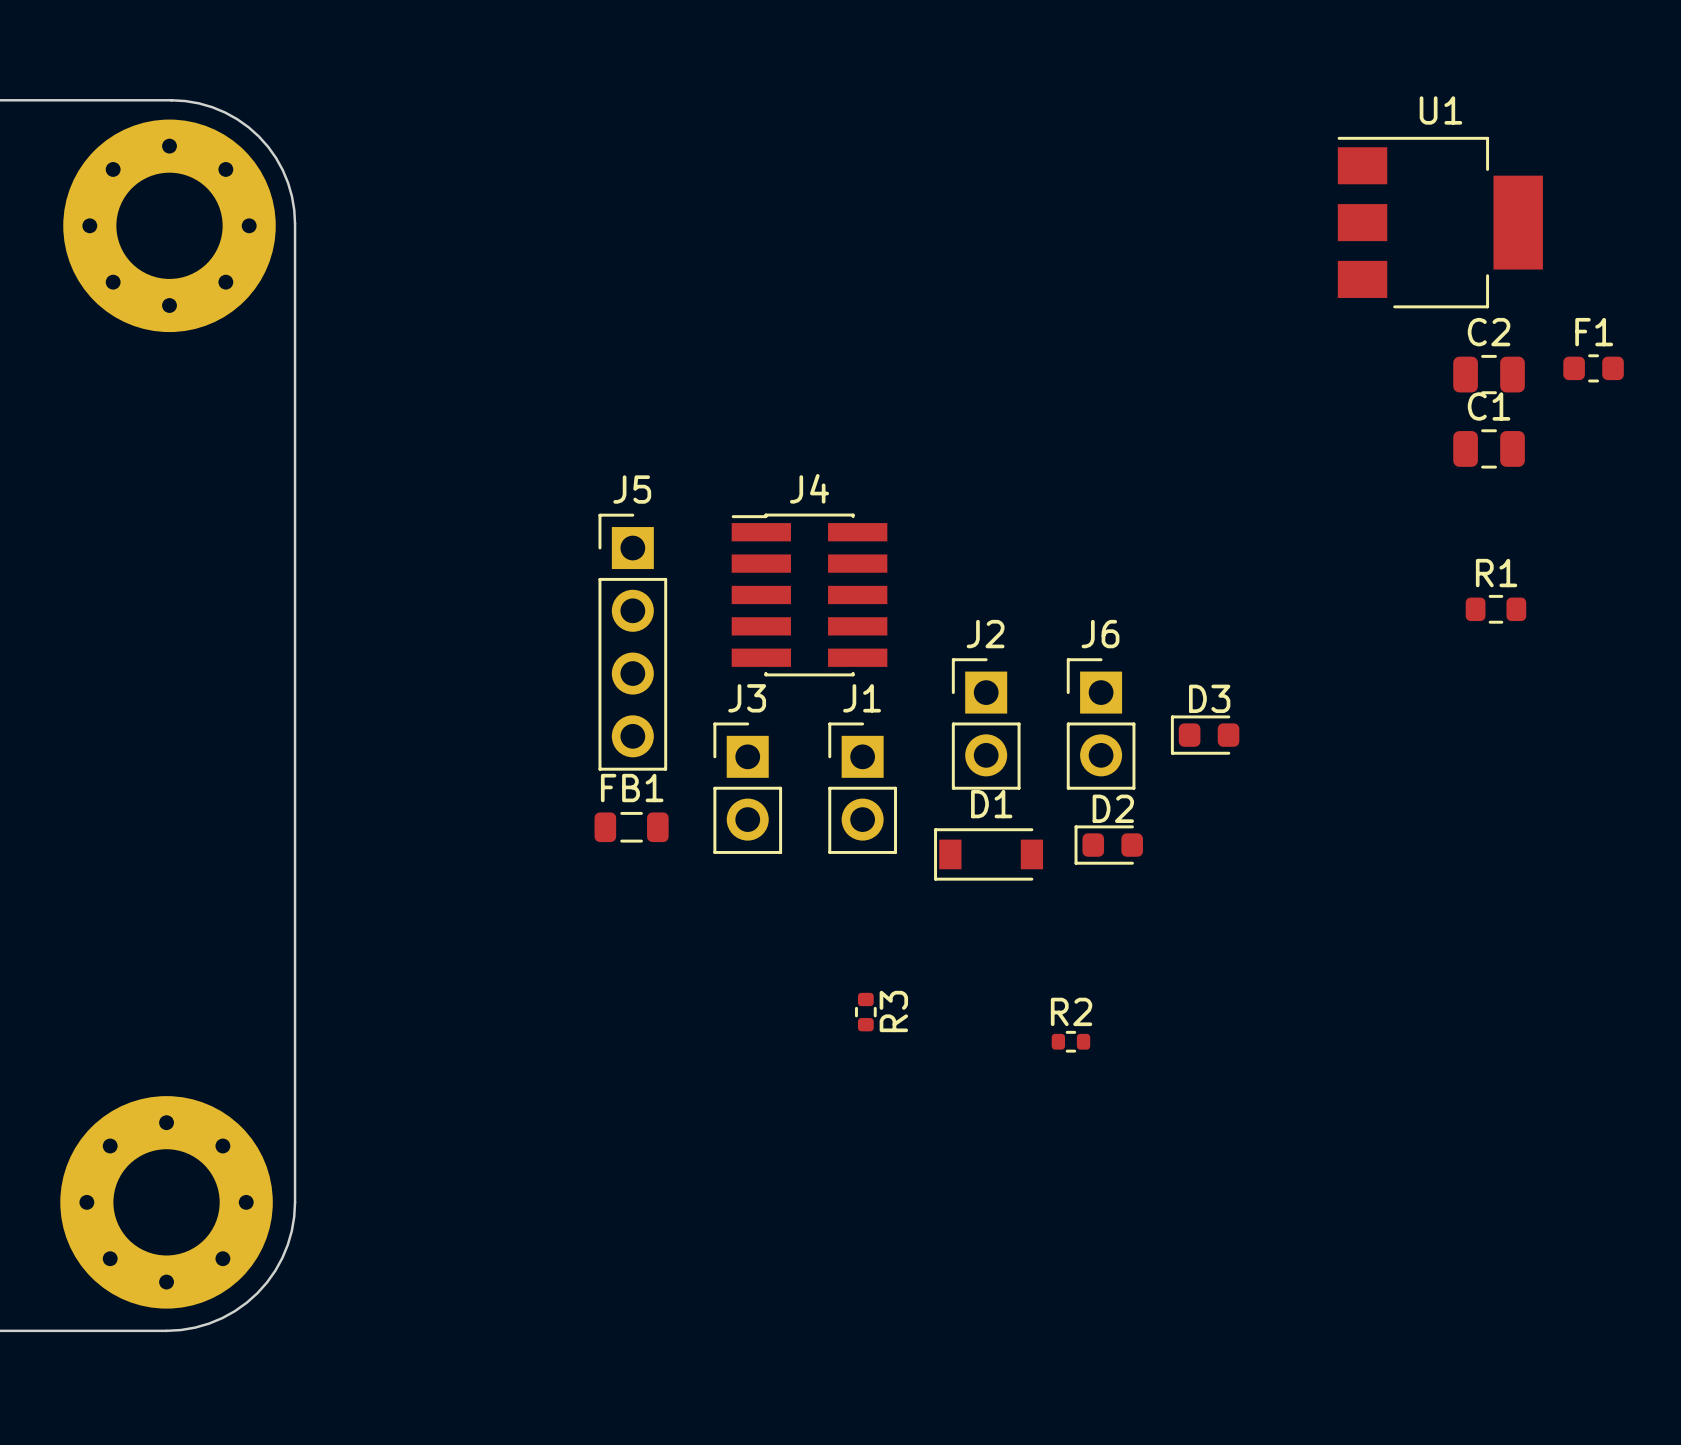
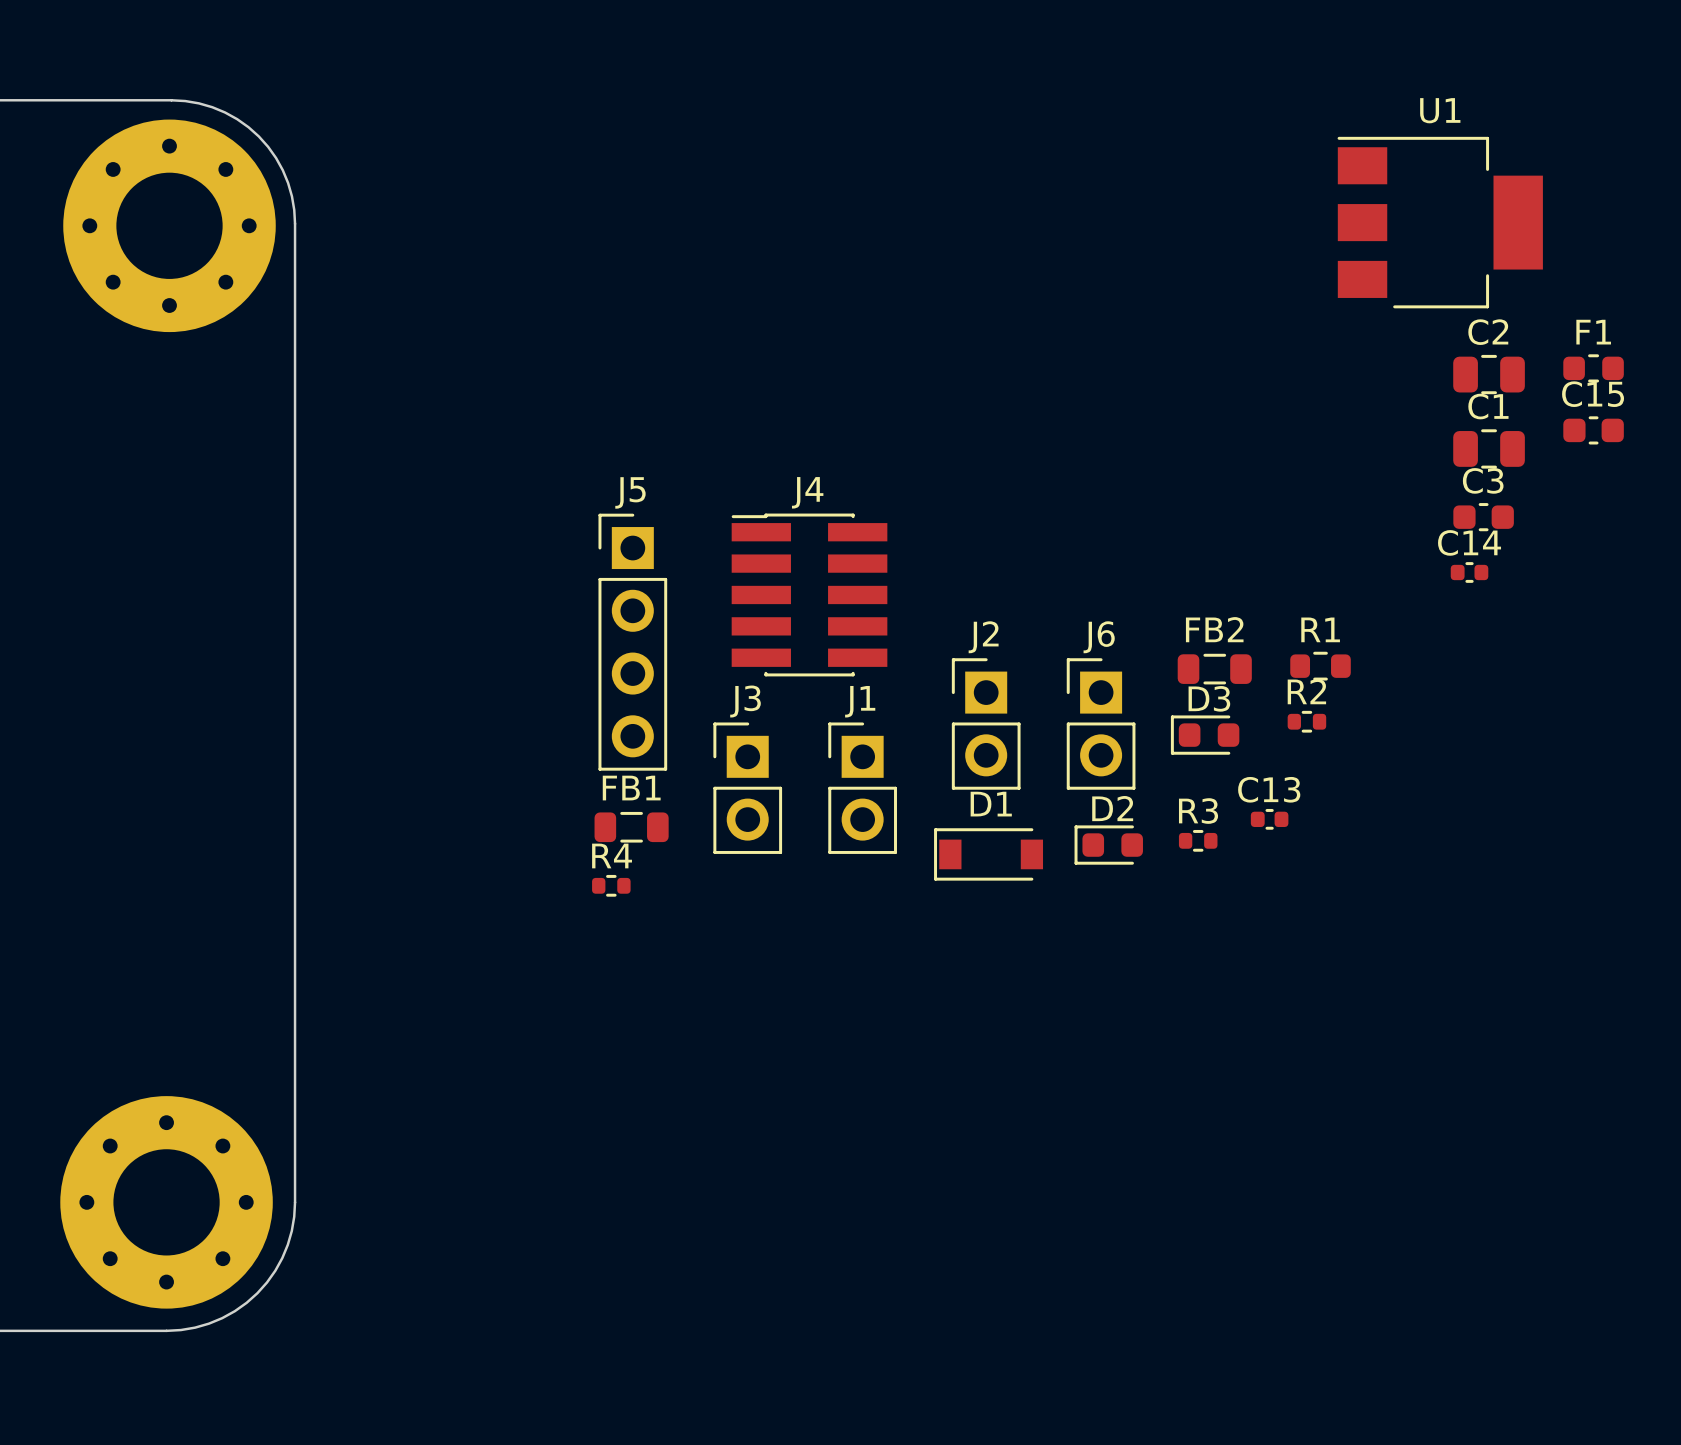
C15: none -> (1593, 430)
C3: none -> (1483, 517)
C14: none -> (1469, 572)
R1 position: (1495, 609) -> (1320, 666)
FB2: none -> (1214, 669)
C13: none -> (1269, 819)
R4: none -> (611, 885)
R3 rotation: 0° (865, 1012) -> 90° clockwise (1198, 840)
R3 position: (865, 1012) -> (1198, 840)
R2 position: (1070, 1041) -> (1306, 721)

